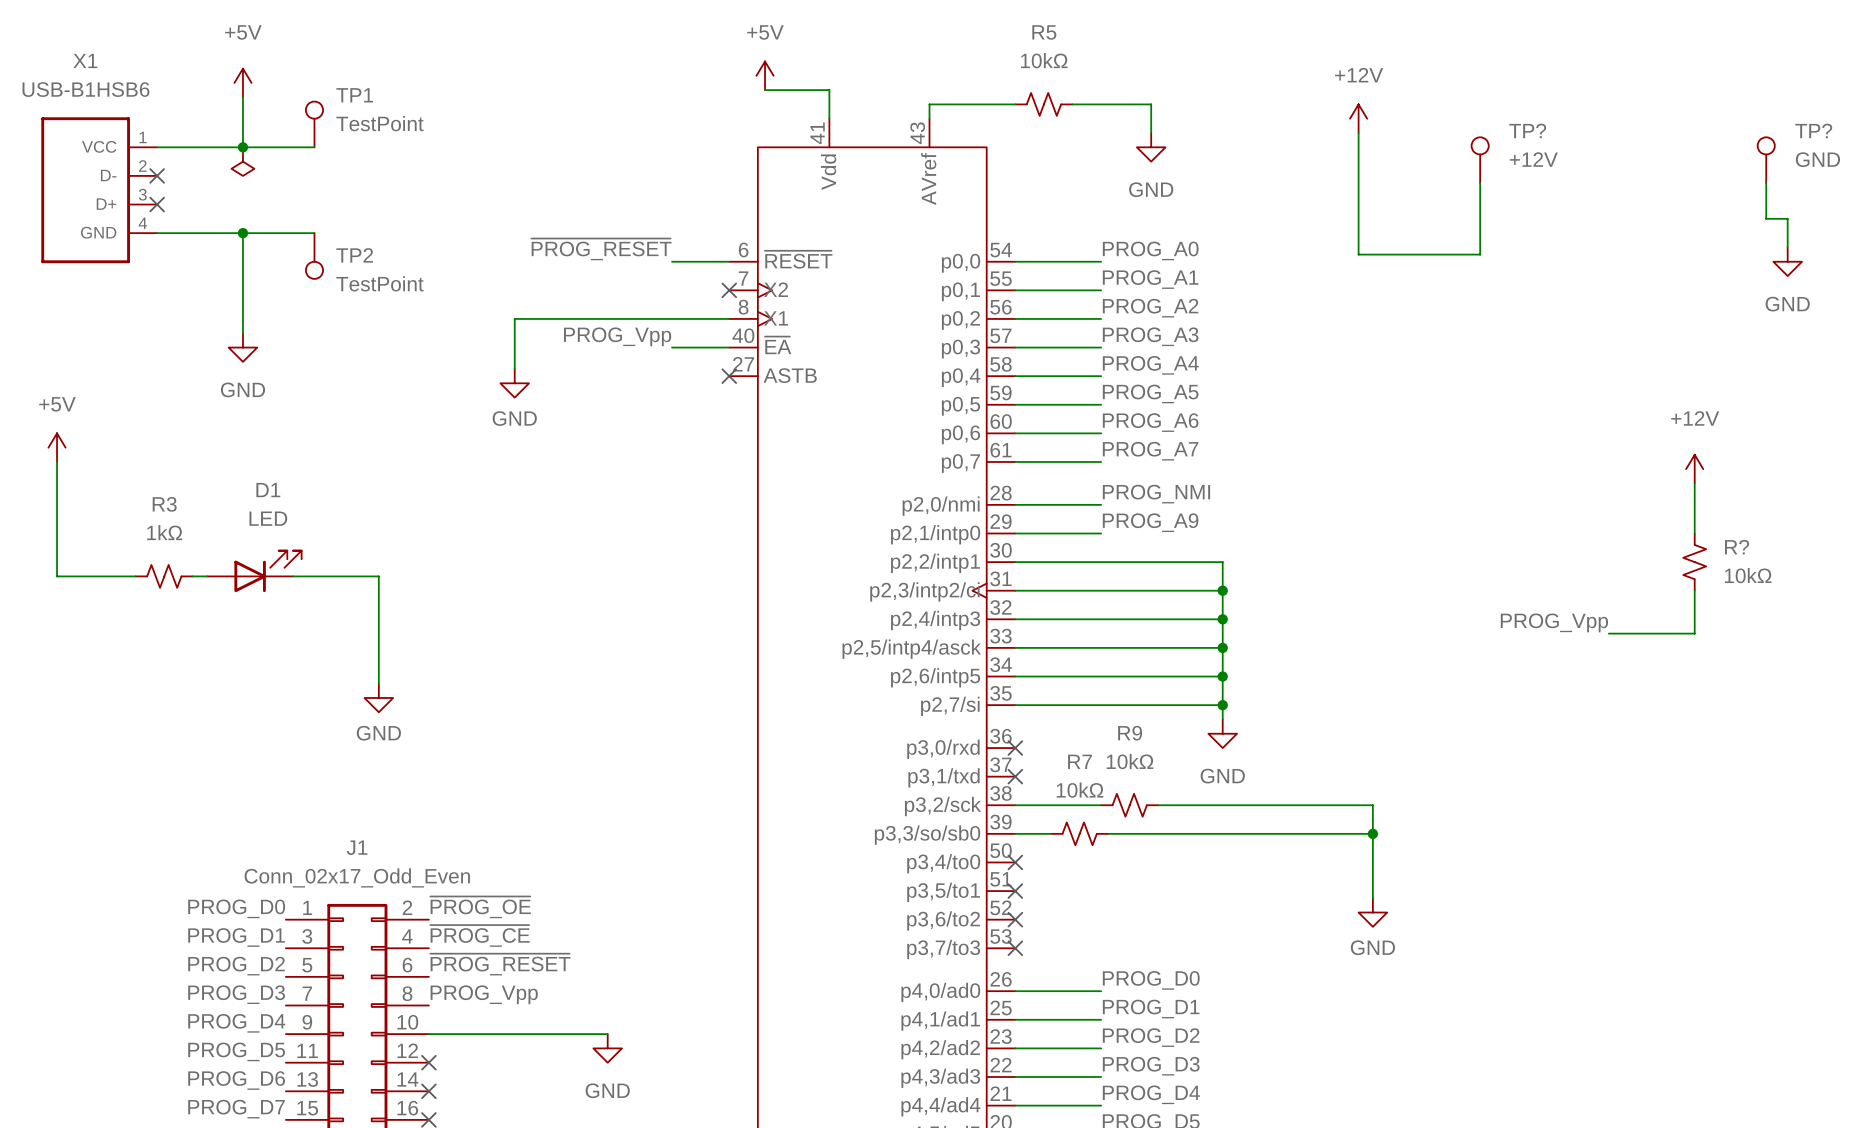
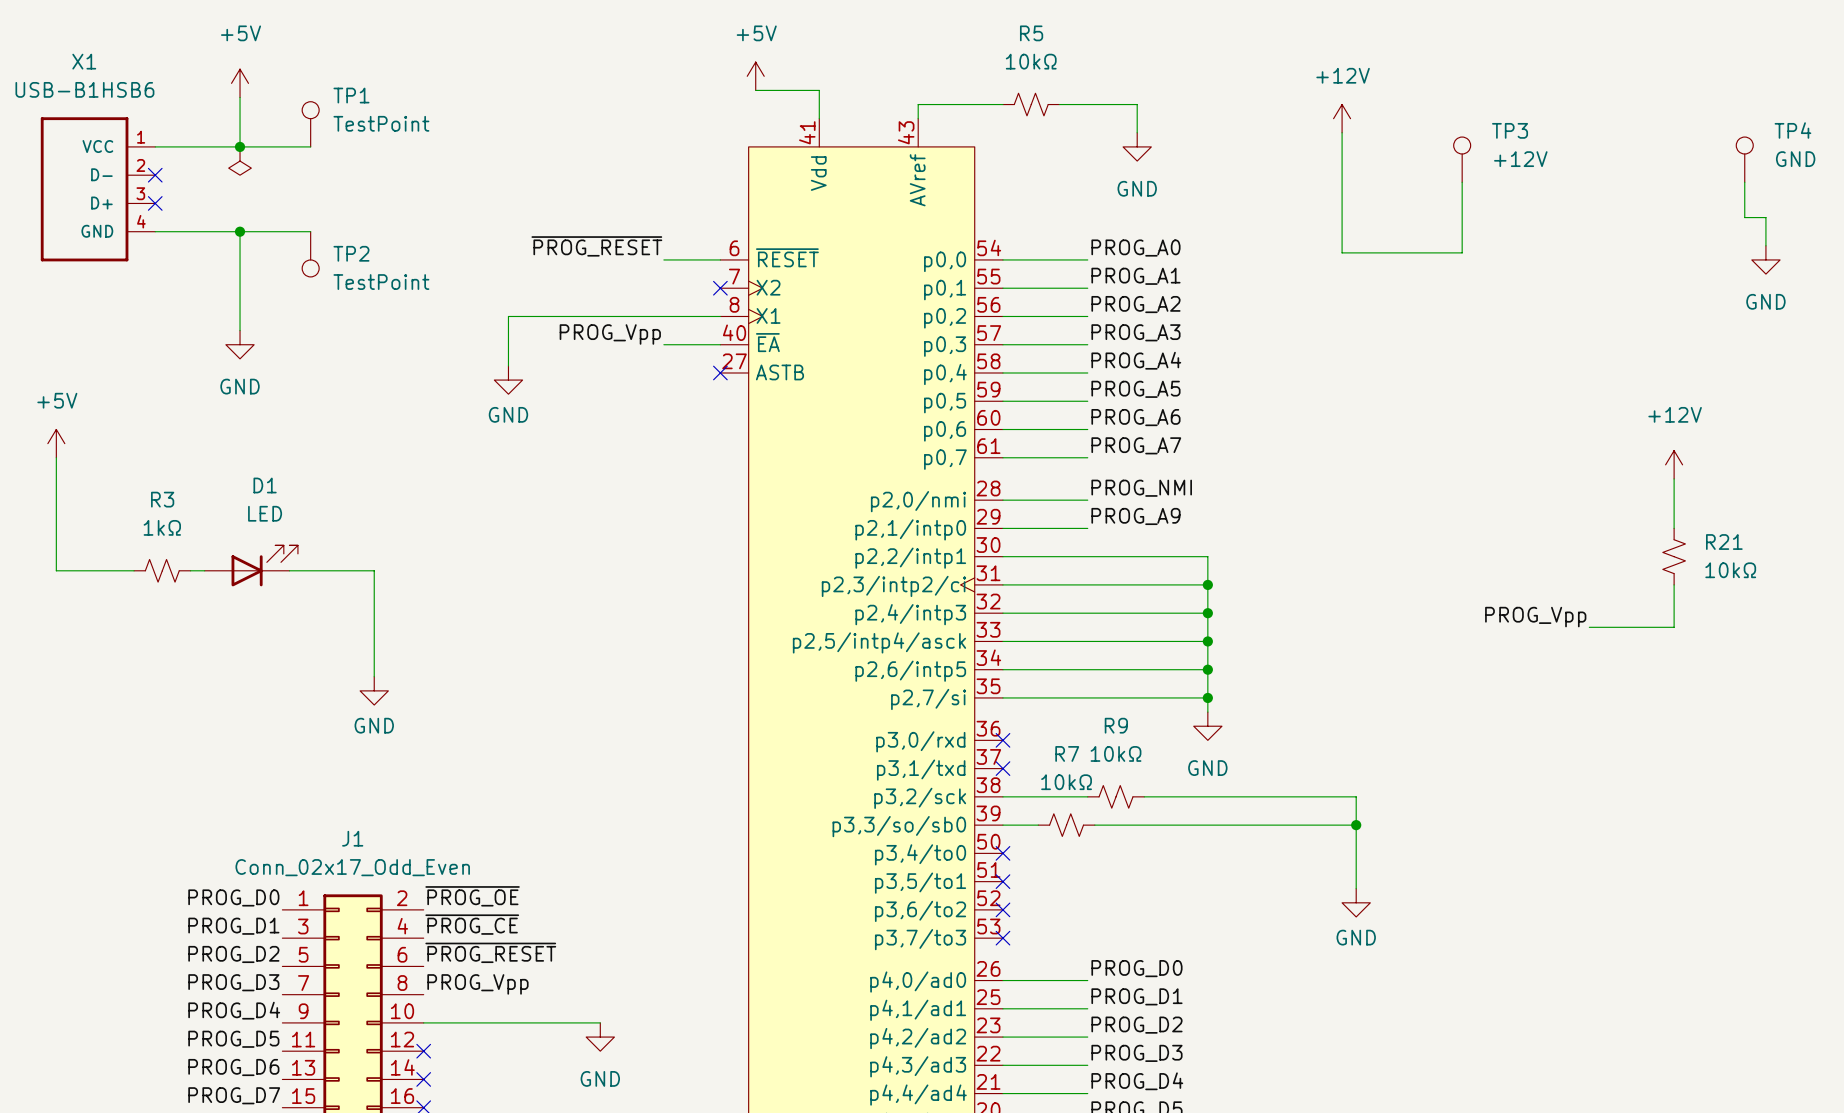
TP? name: TP? (1527, 130) -> TP3 (1510, 130)
TP? name: TP? (1813, 130) -> TP4 (1792, 130)
R? name: R? (1737, 547) -> R21 (1724, 542)

